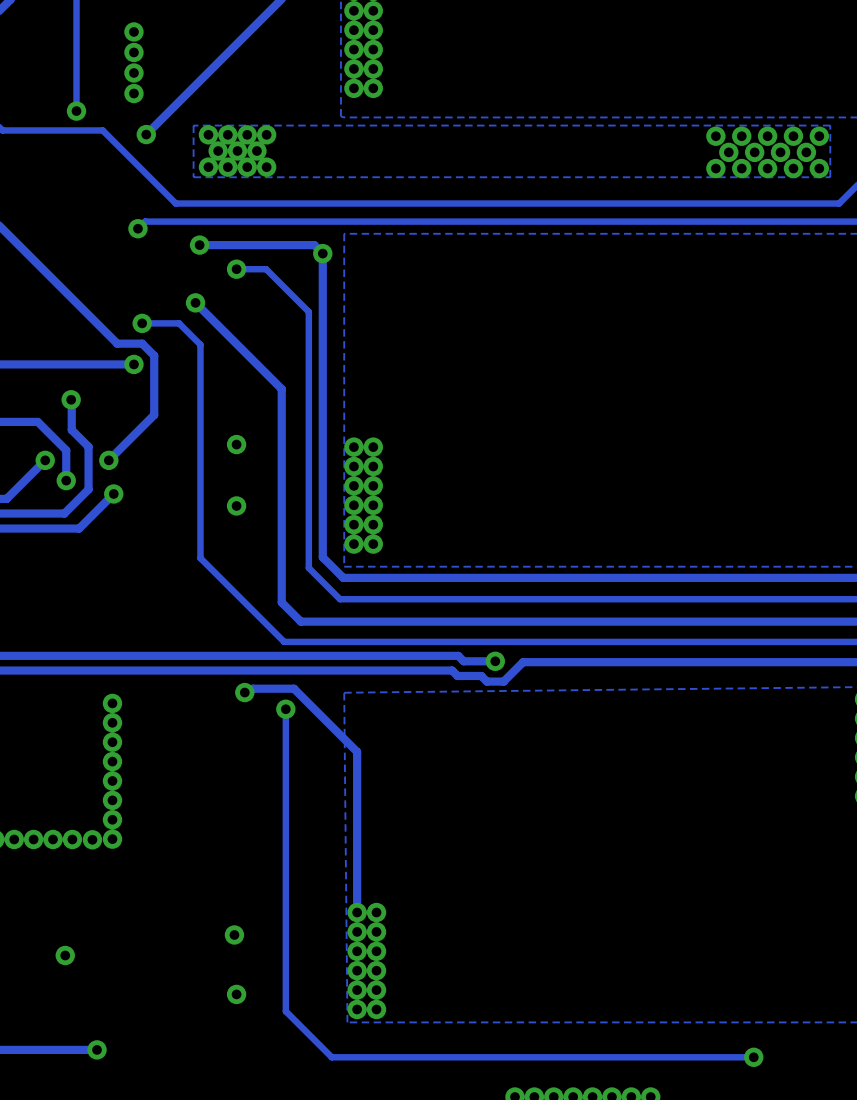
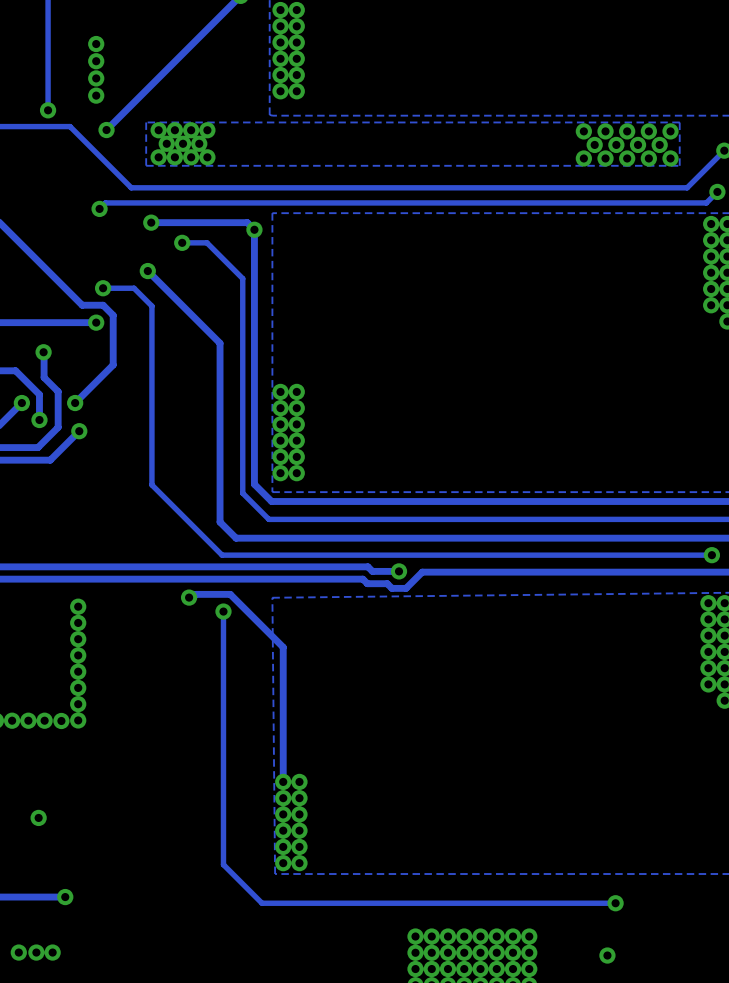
via: (236, 444) -> none
via: (236, 505) -> none
via: (234, 934) -> none
via: (236, 994) -> none

